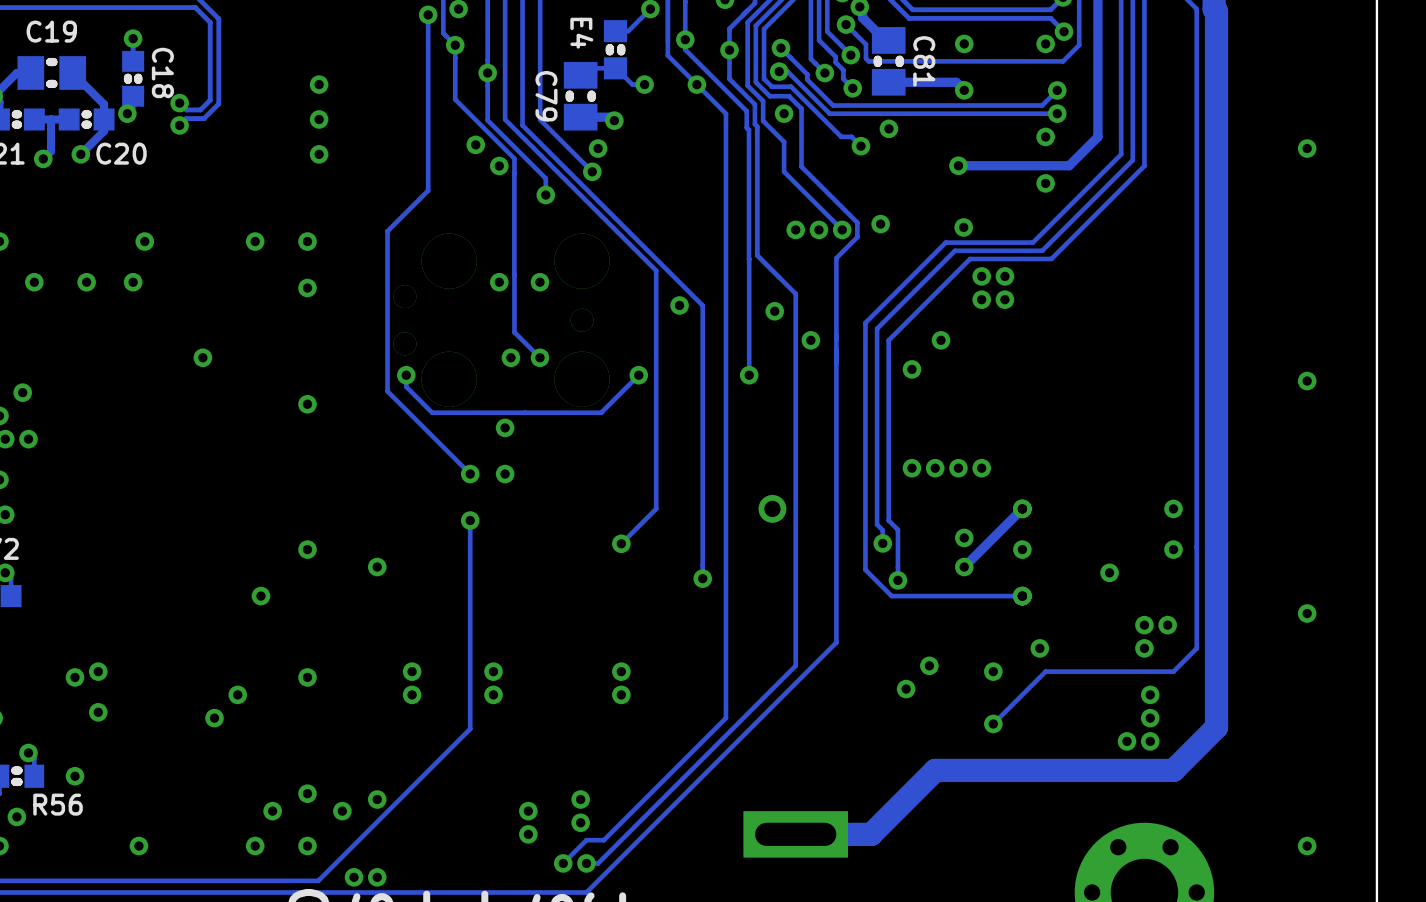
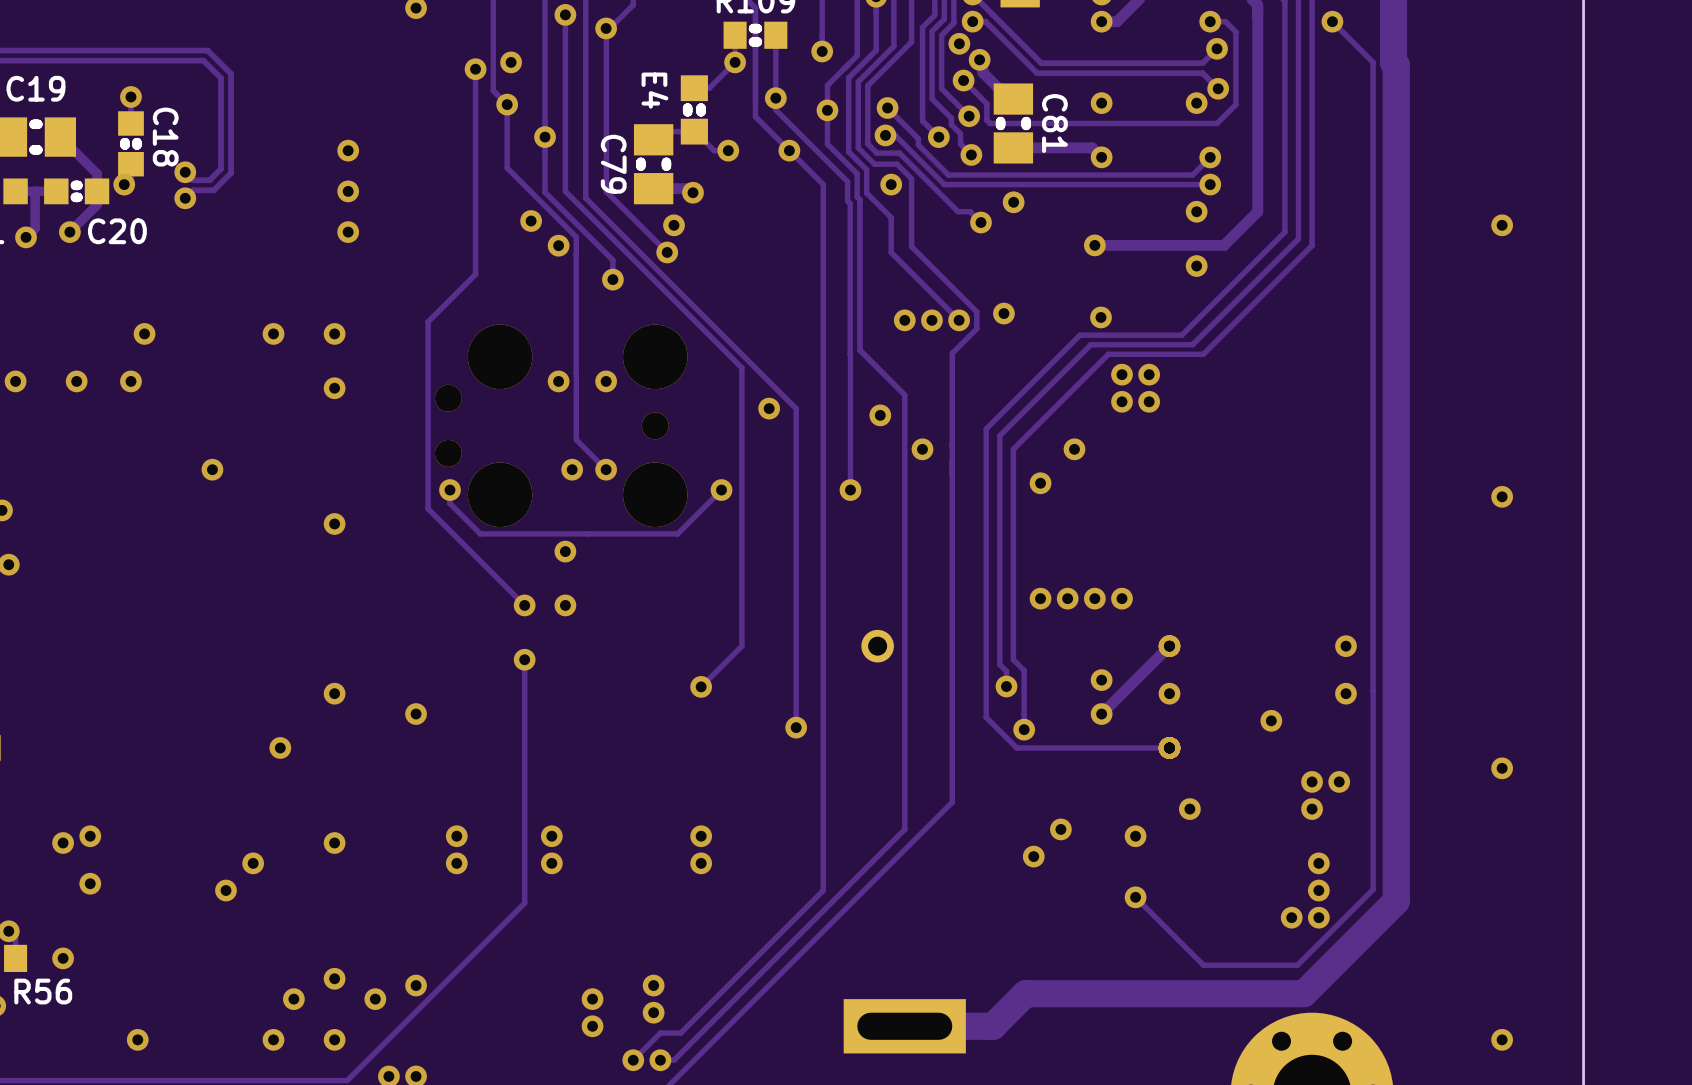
track: (1196, 648) (1173, 671) (1045, 671) (993, 723) -> (1373, 809) (1373, 889) (1297, 965) (1203, 965) (1135, 897)
track: (1173, 770) (935, 770) (899, 806) -> (1346, 951) (1303, 993) (1025, 993)

